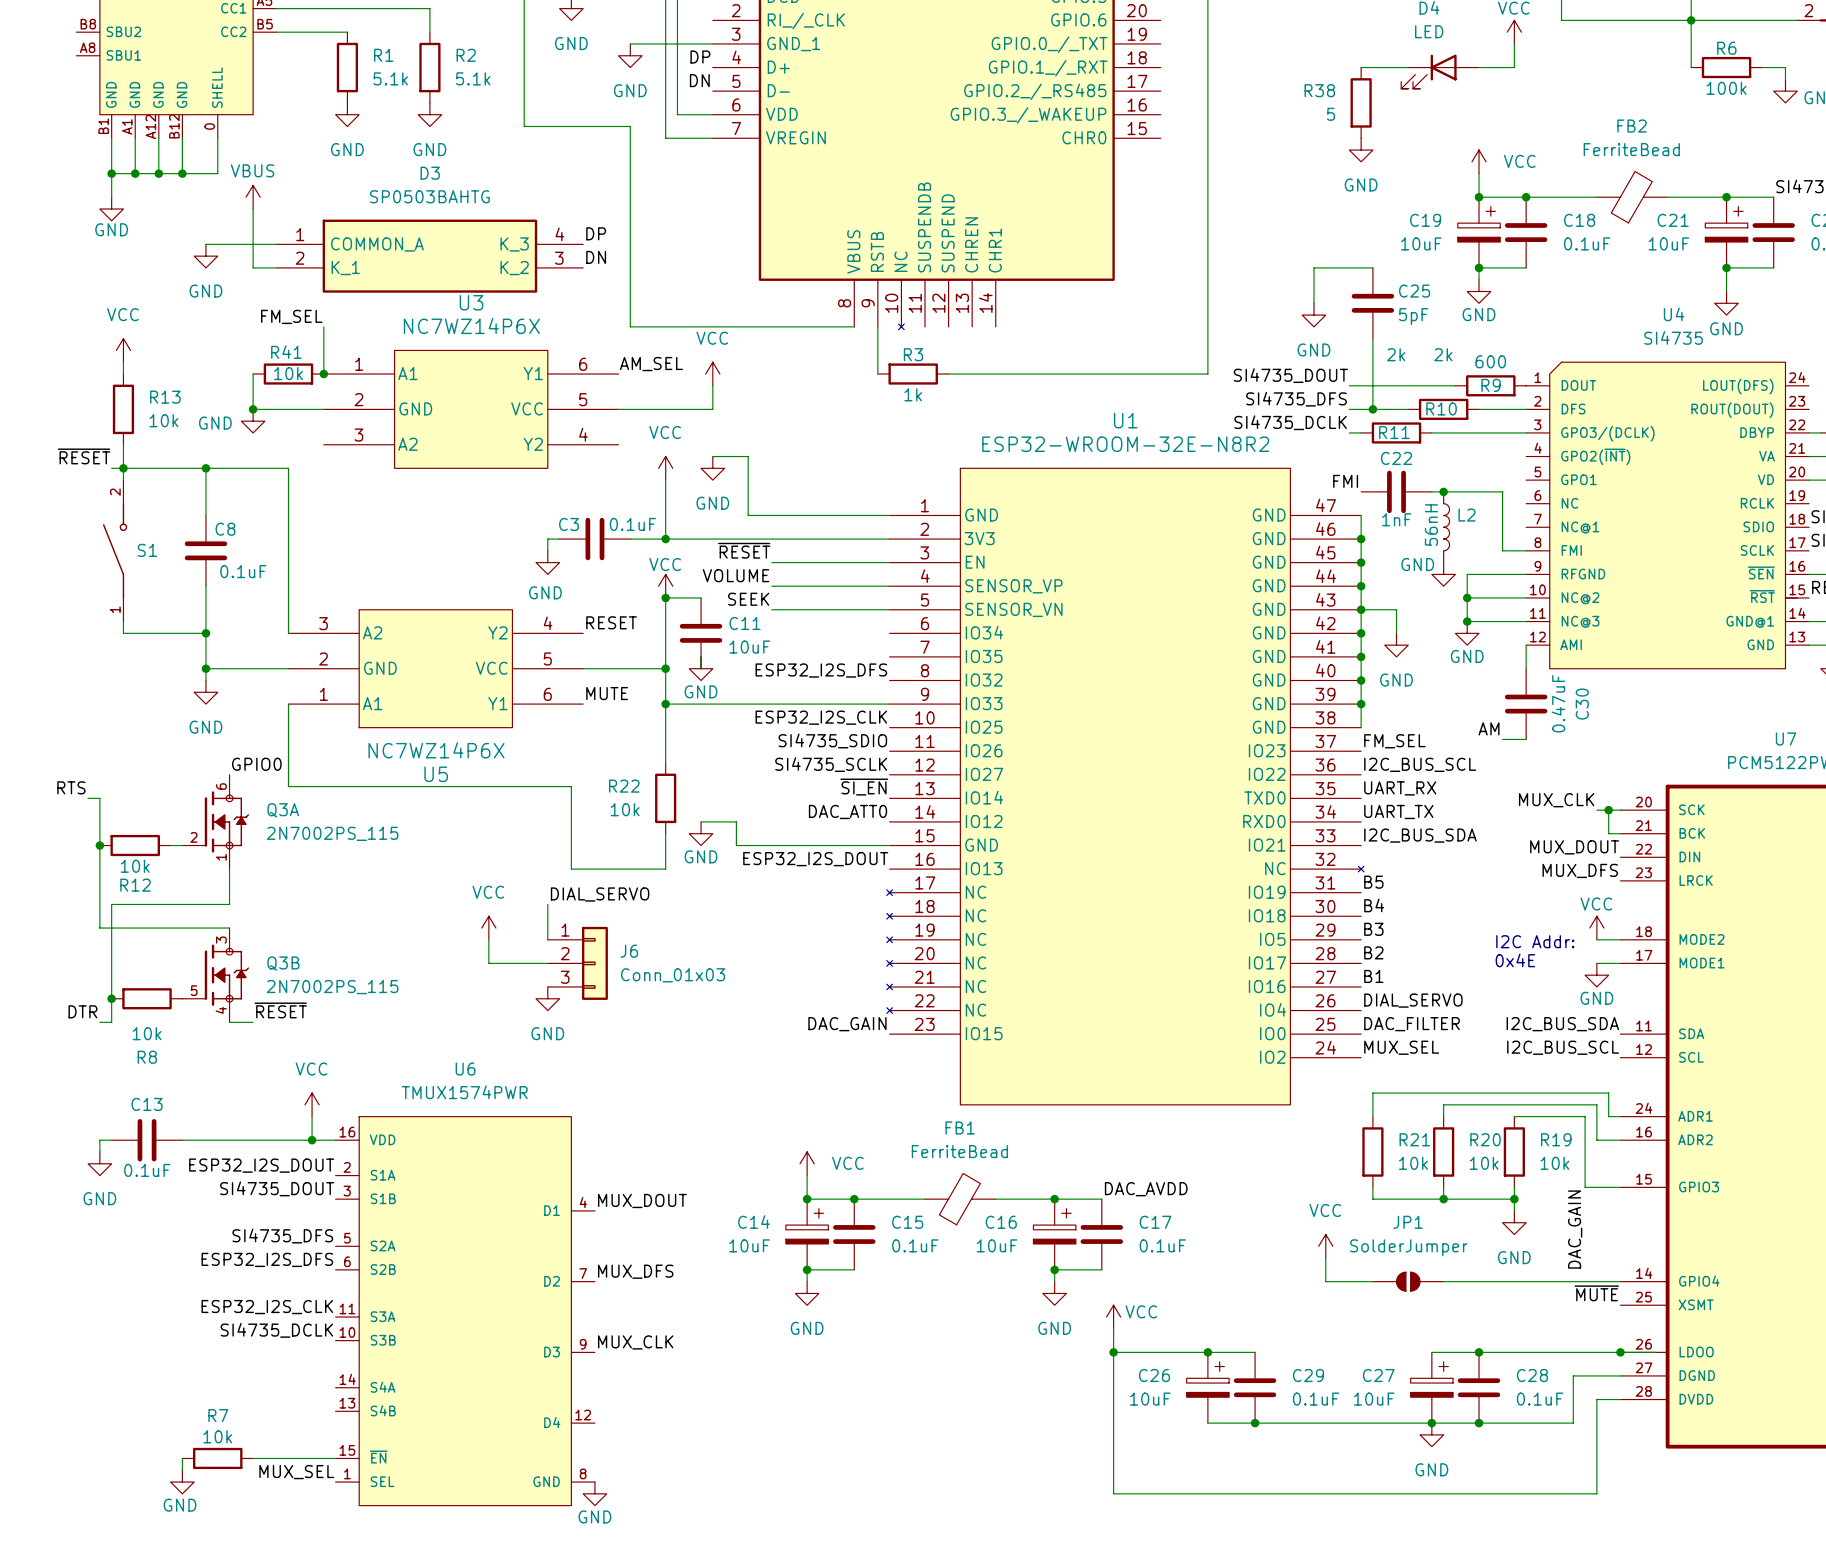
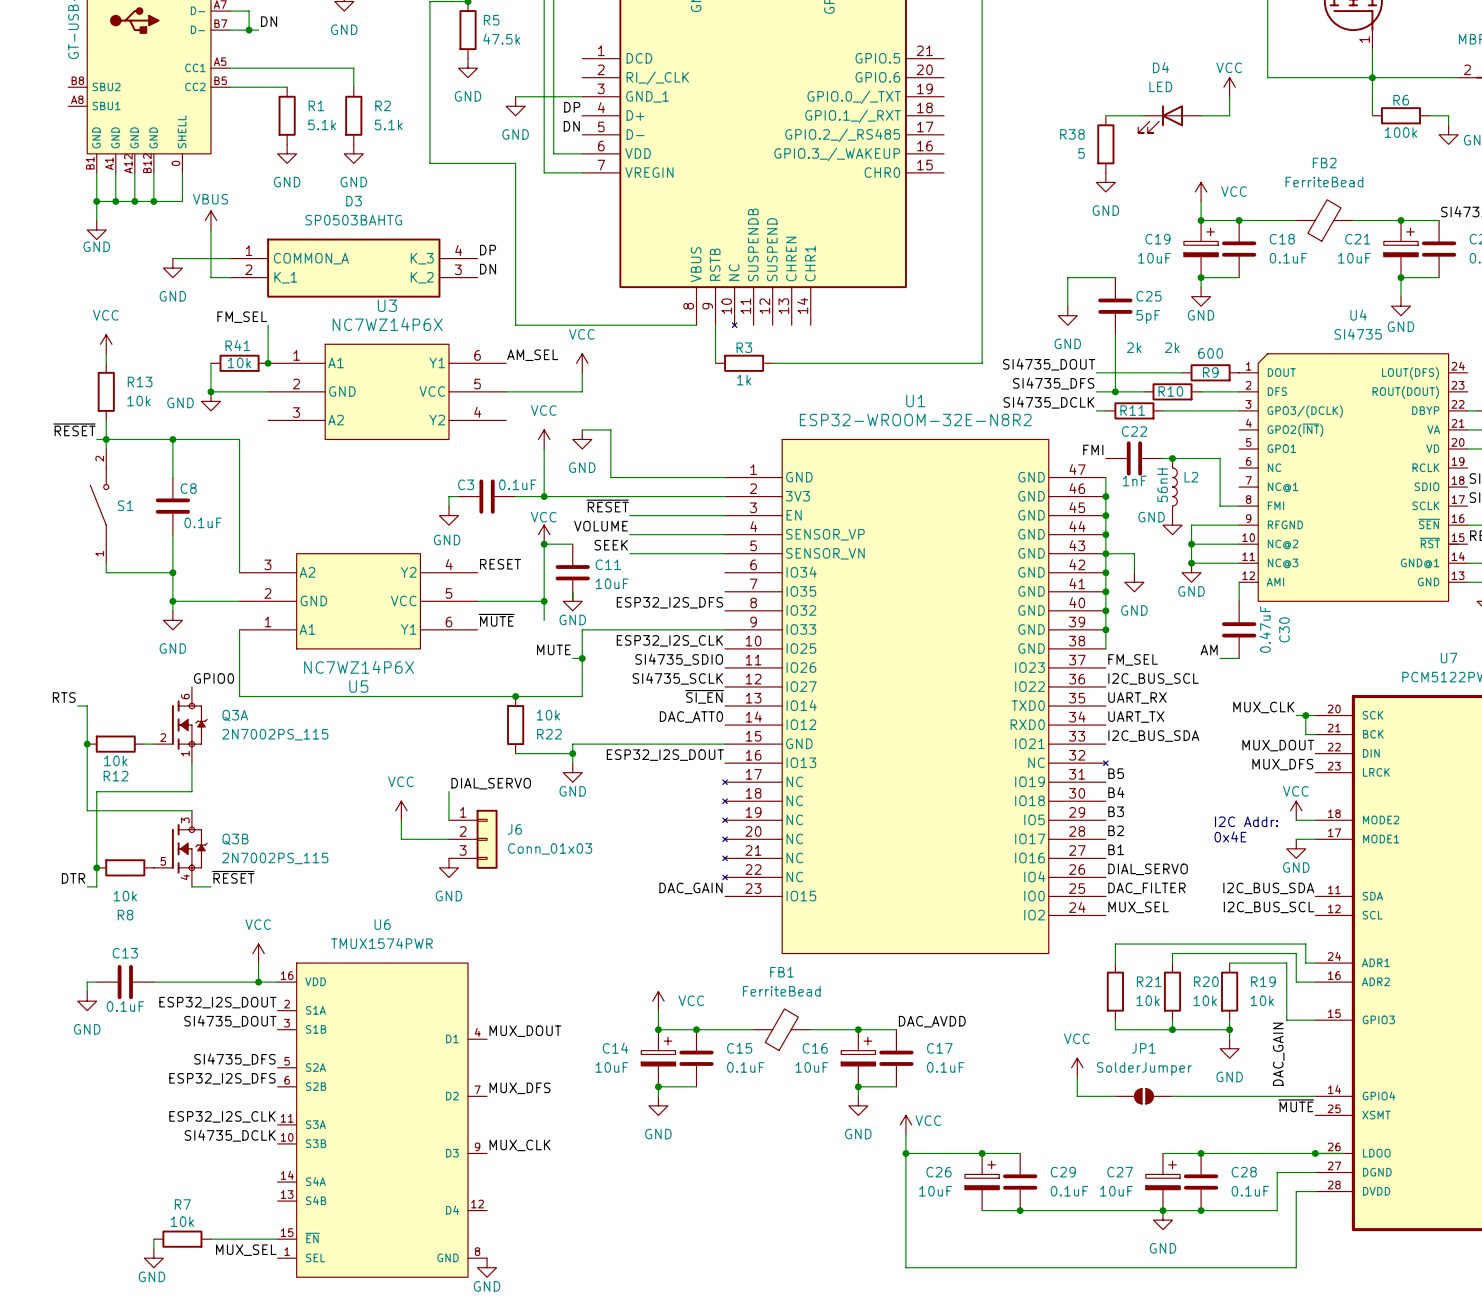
wire: (665, 692) (665, 763) -> none
label: MUTE (607, 693) -> ~{MUTE} (496, 620)
wire: (665, 704) (712, 704) -> (468, 696) (582, 696) (582, 629)
junction: (665, 704) -> none
label: none -> MUTE (553, 649)
wire: none -> (572, 658) (582, 658)
junction: none -> (582, 658)
wire: (571, 786) (571, 869) (665, 869) (665, 833) -> none
R22 name position: R22 (624, 786) -> R22 (549, 734)
junction: none -> (515, 696)
R22 position: (665, 798) -> (515, 725)
R22 value position: 10k (625, 809) -> 10k (548, 715)
wire: (701, 821) (736, 821) (736, 845) -> (572, 763) (572, 744) (601, 744)
power symbol position: GND (701, 833) -> GND (572, 772)
wire: none -> (515, 753) (572, 753)
junction: none -> (572, 753)

